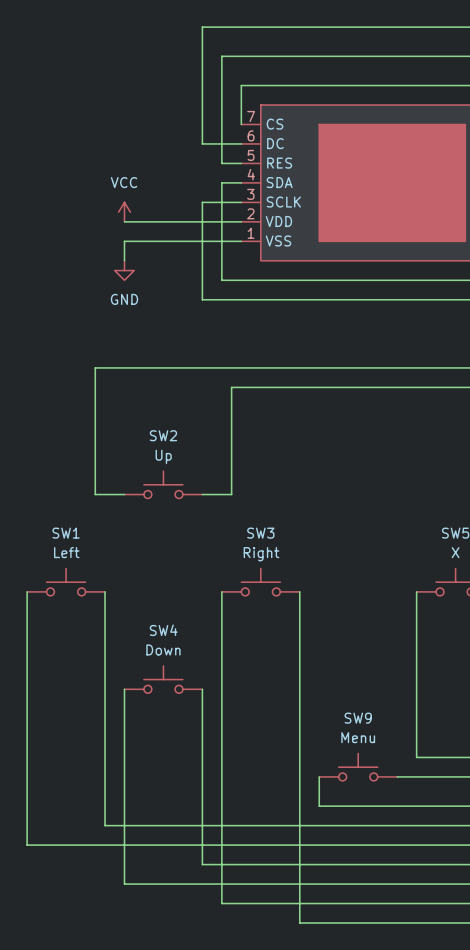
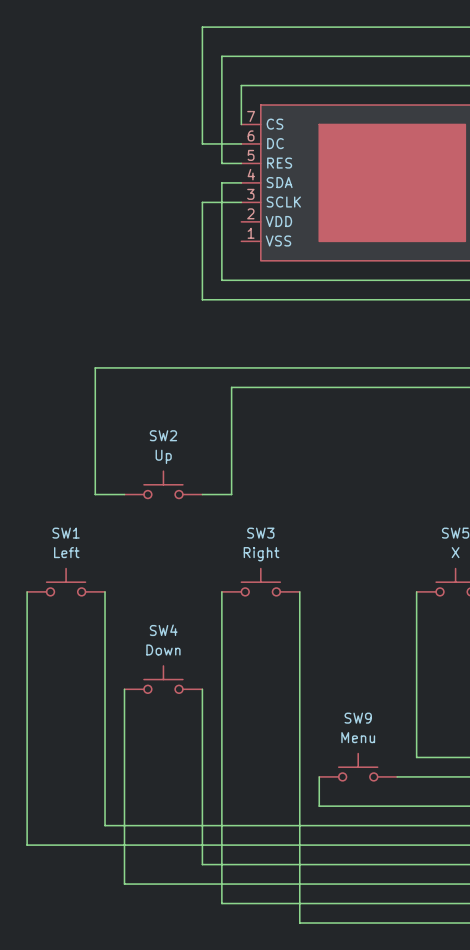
power symbol: VCC (124, 212) -> none
wire: (124, 221) (241, 221) -> none
wire: (241, 241) (124, 241) (124, 260) -> none
power symbol: GND (124, 270) -> none

